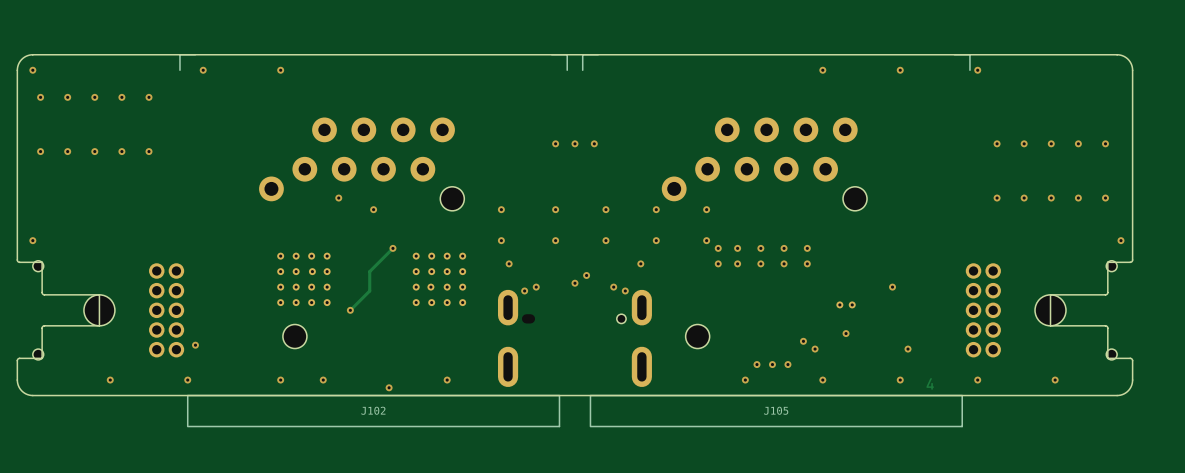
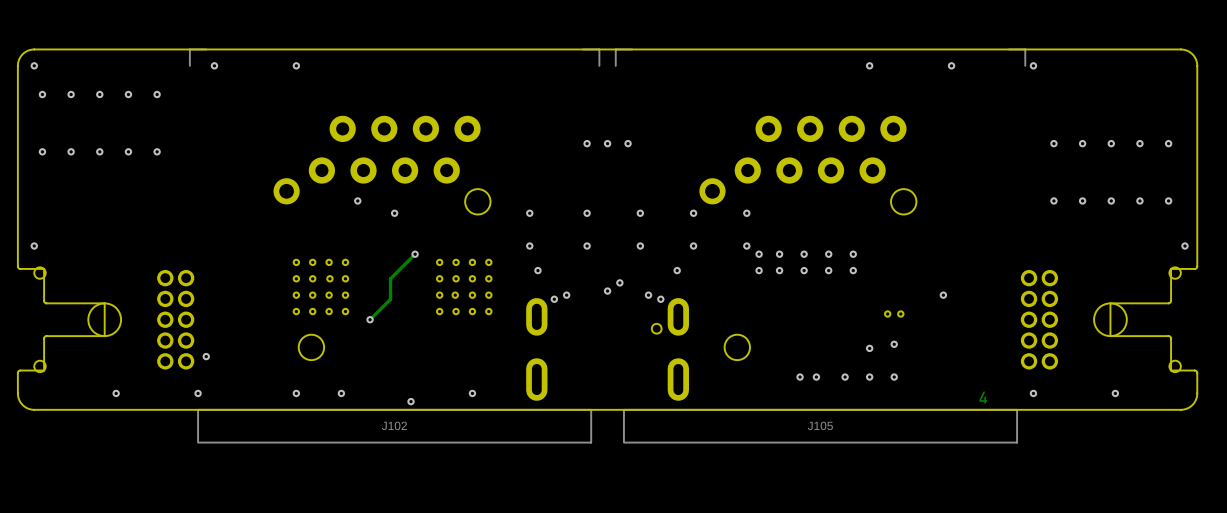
via: none -> (869, 348)
via: (803, 341) -> none
via: (815, 349) -> none
via: (908, 349) -> none
via: (787, 364) -> none
via: none -> (845, 377)
via: none -> (869, 377)
via: none -> (894, 377)
via: (745, 380) -> none
via: (822, 380) -> none
via: (900, 380) -> none

